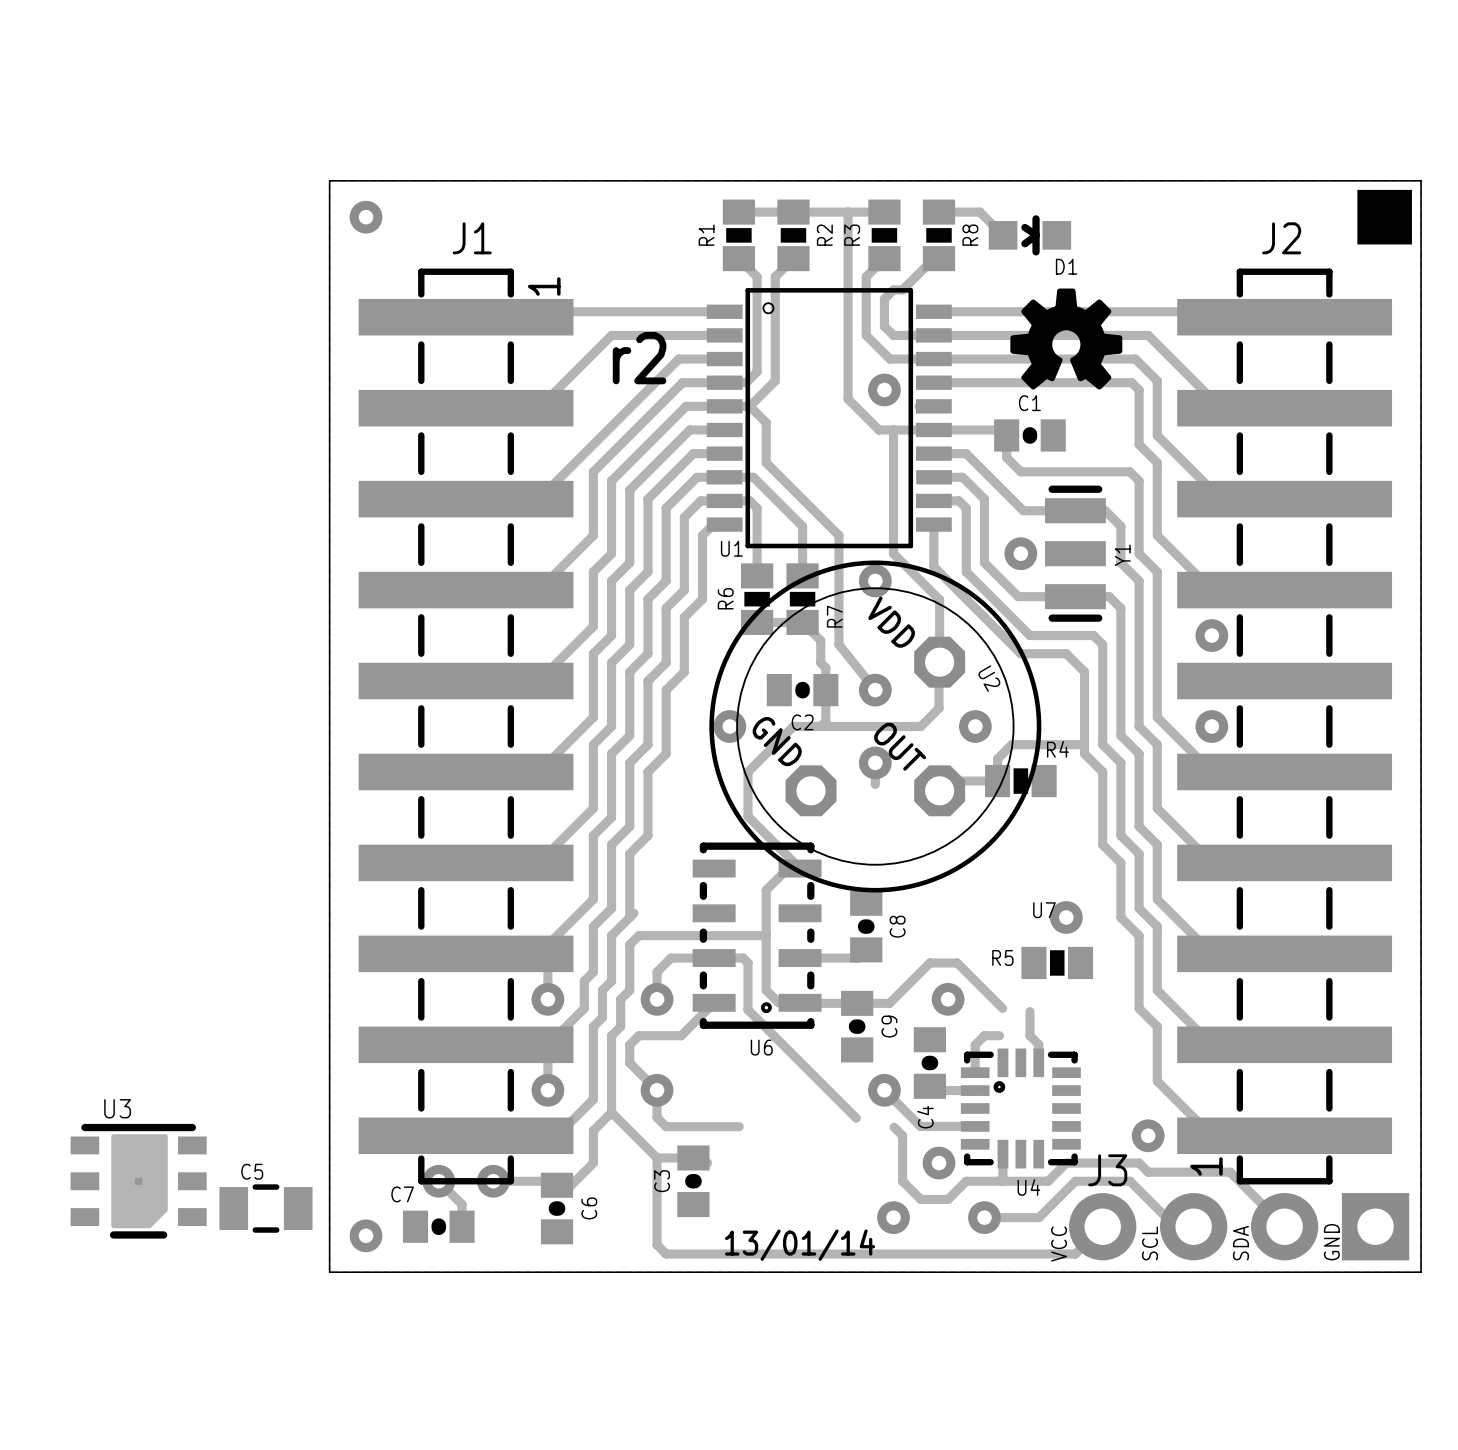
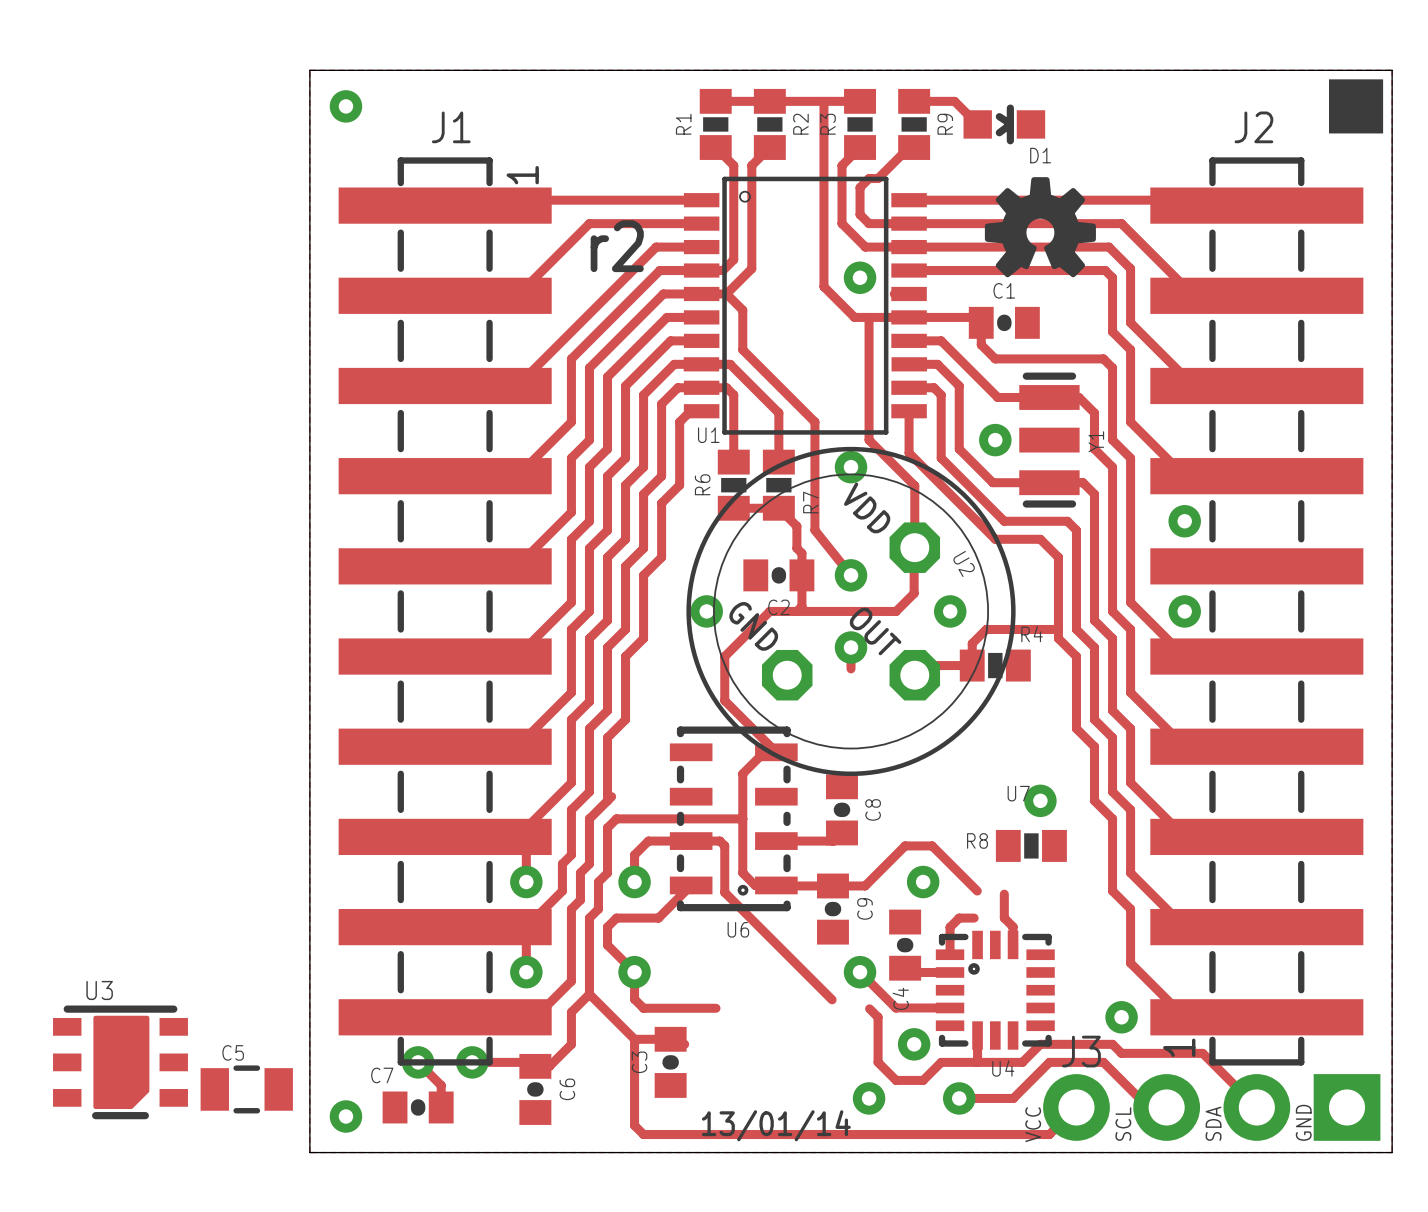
R8 name: R8 (970, 235) -> R9 (945, 124)
R5 name: R5 (1002, 957) -> R8 (977, 840)

